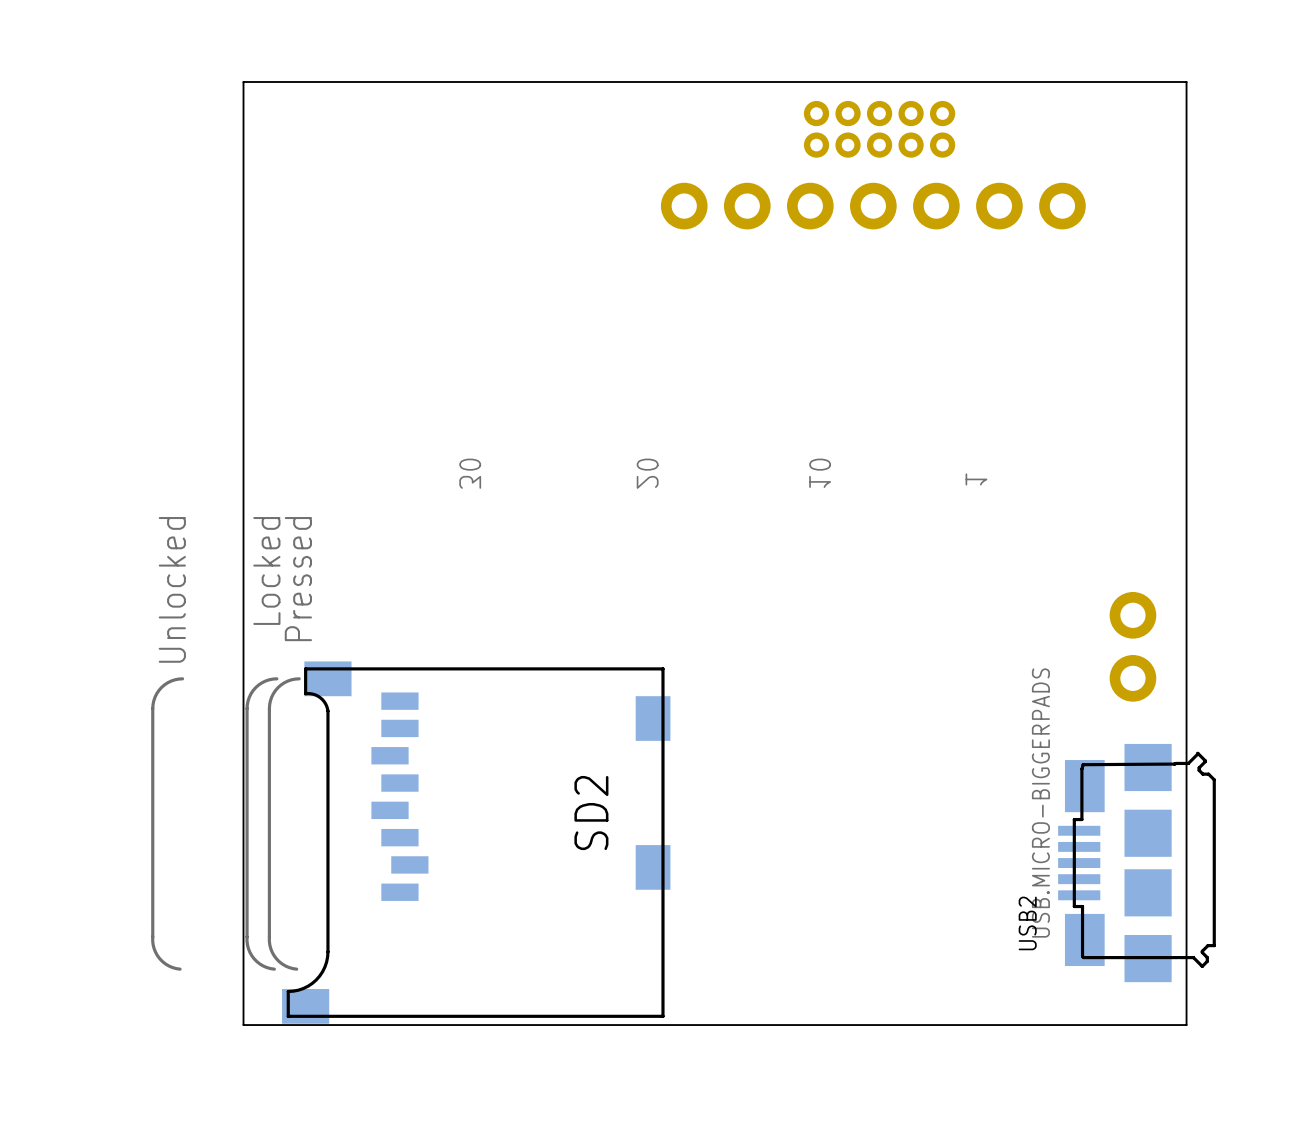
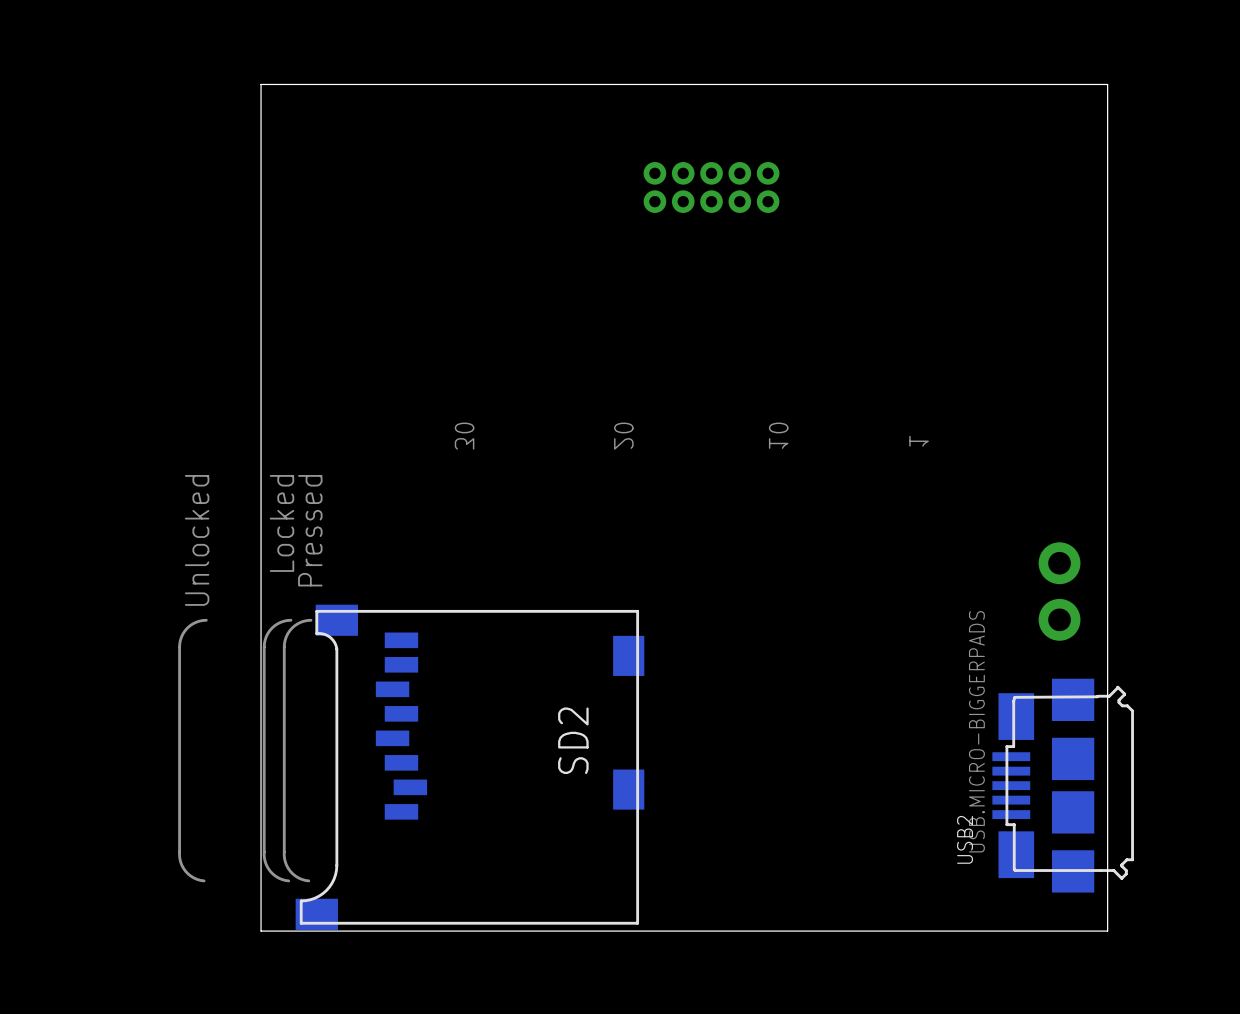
part position: (879, 129) -> (711, 187)
part: (873, 206) -> none

